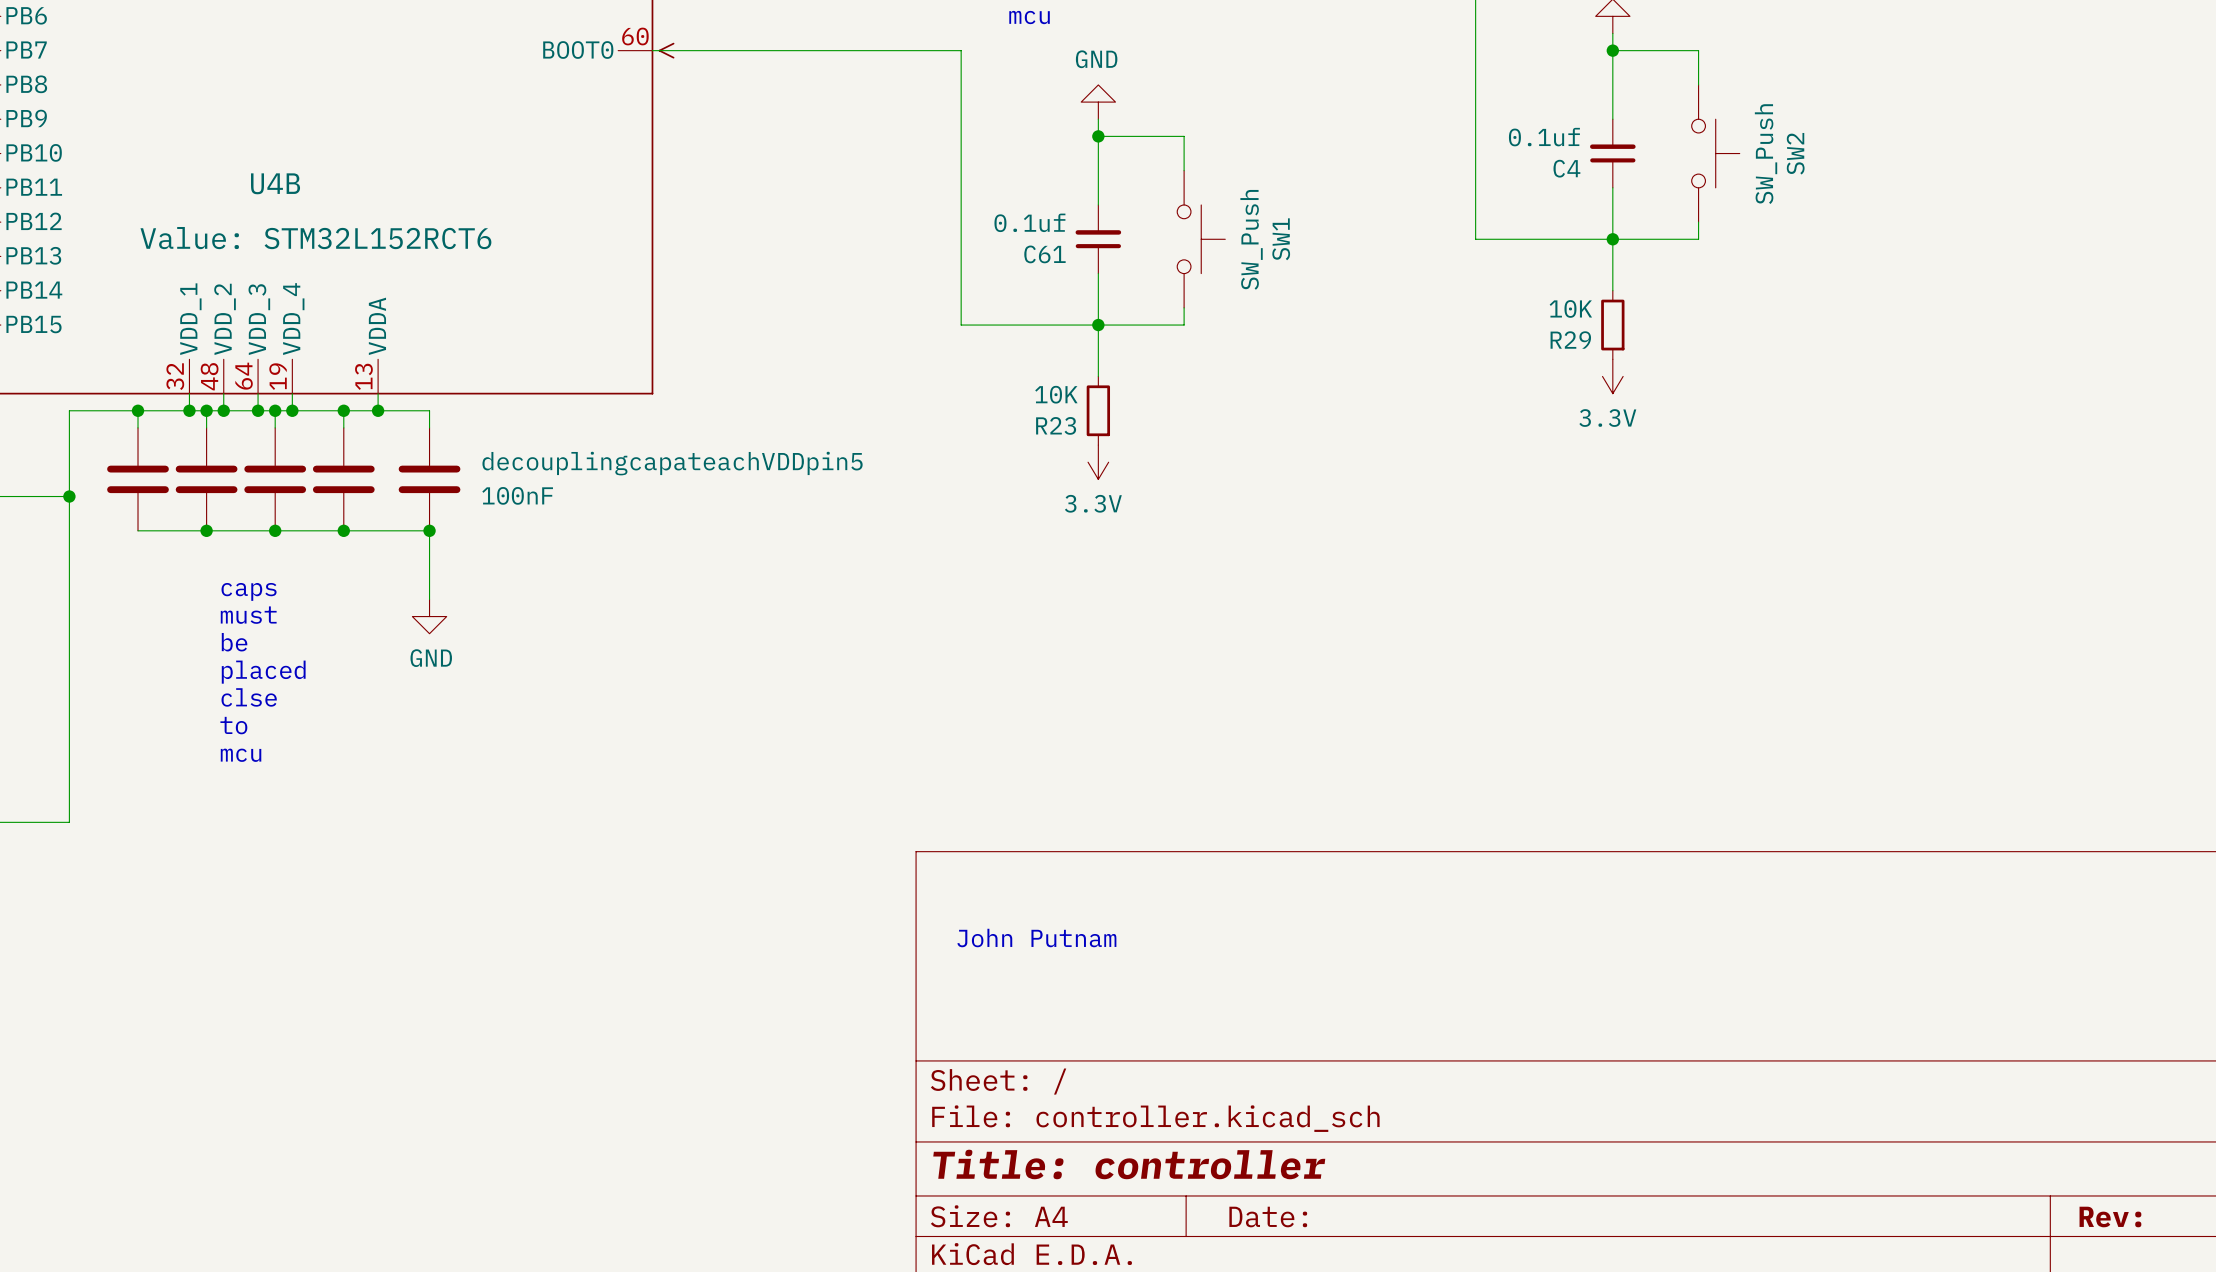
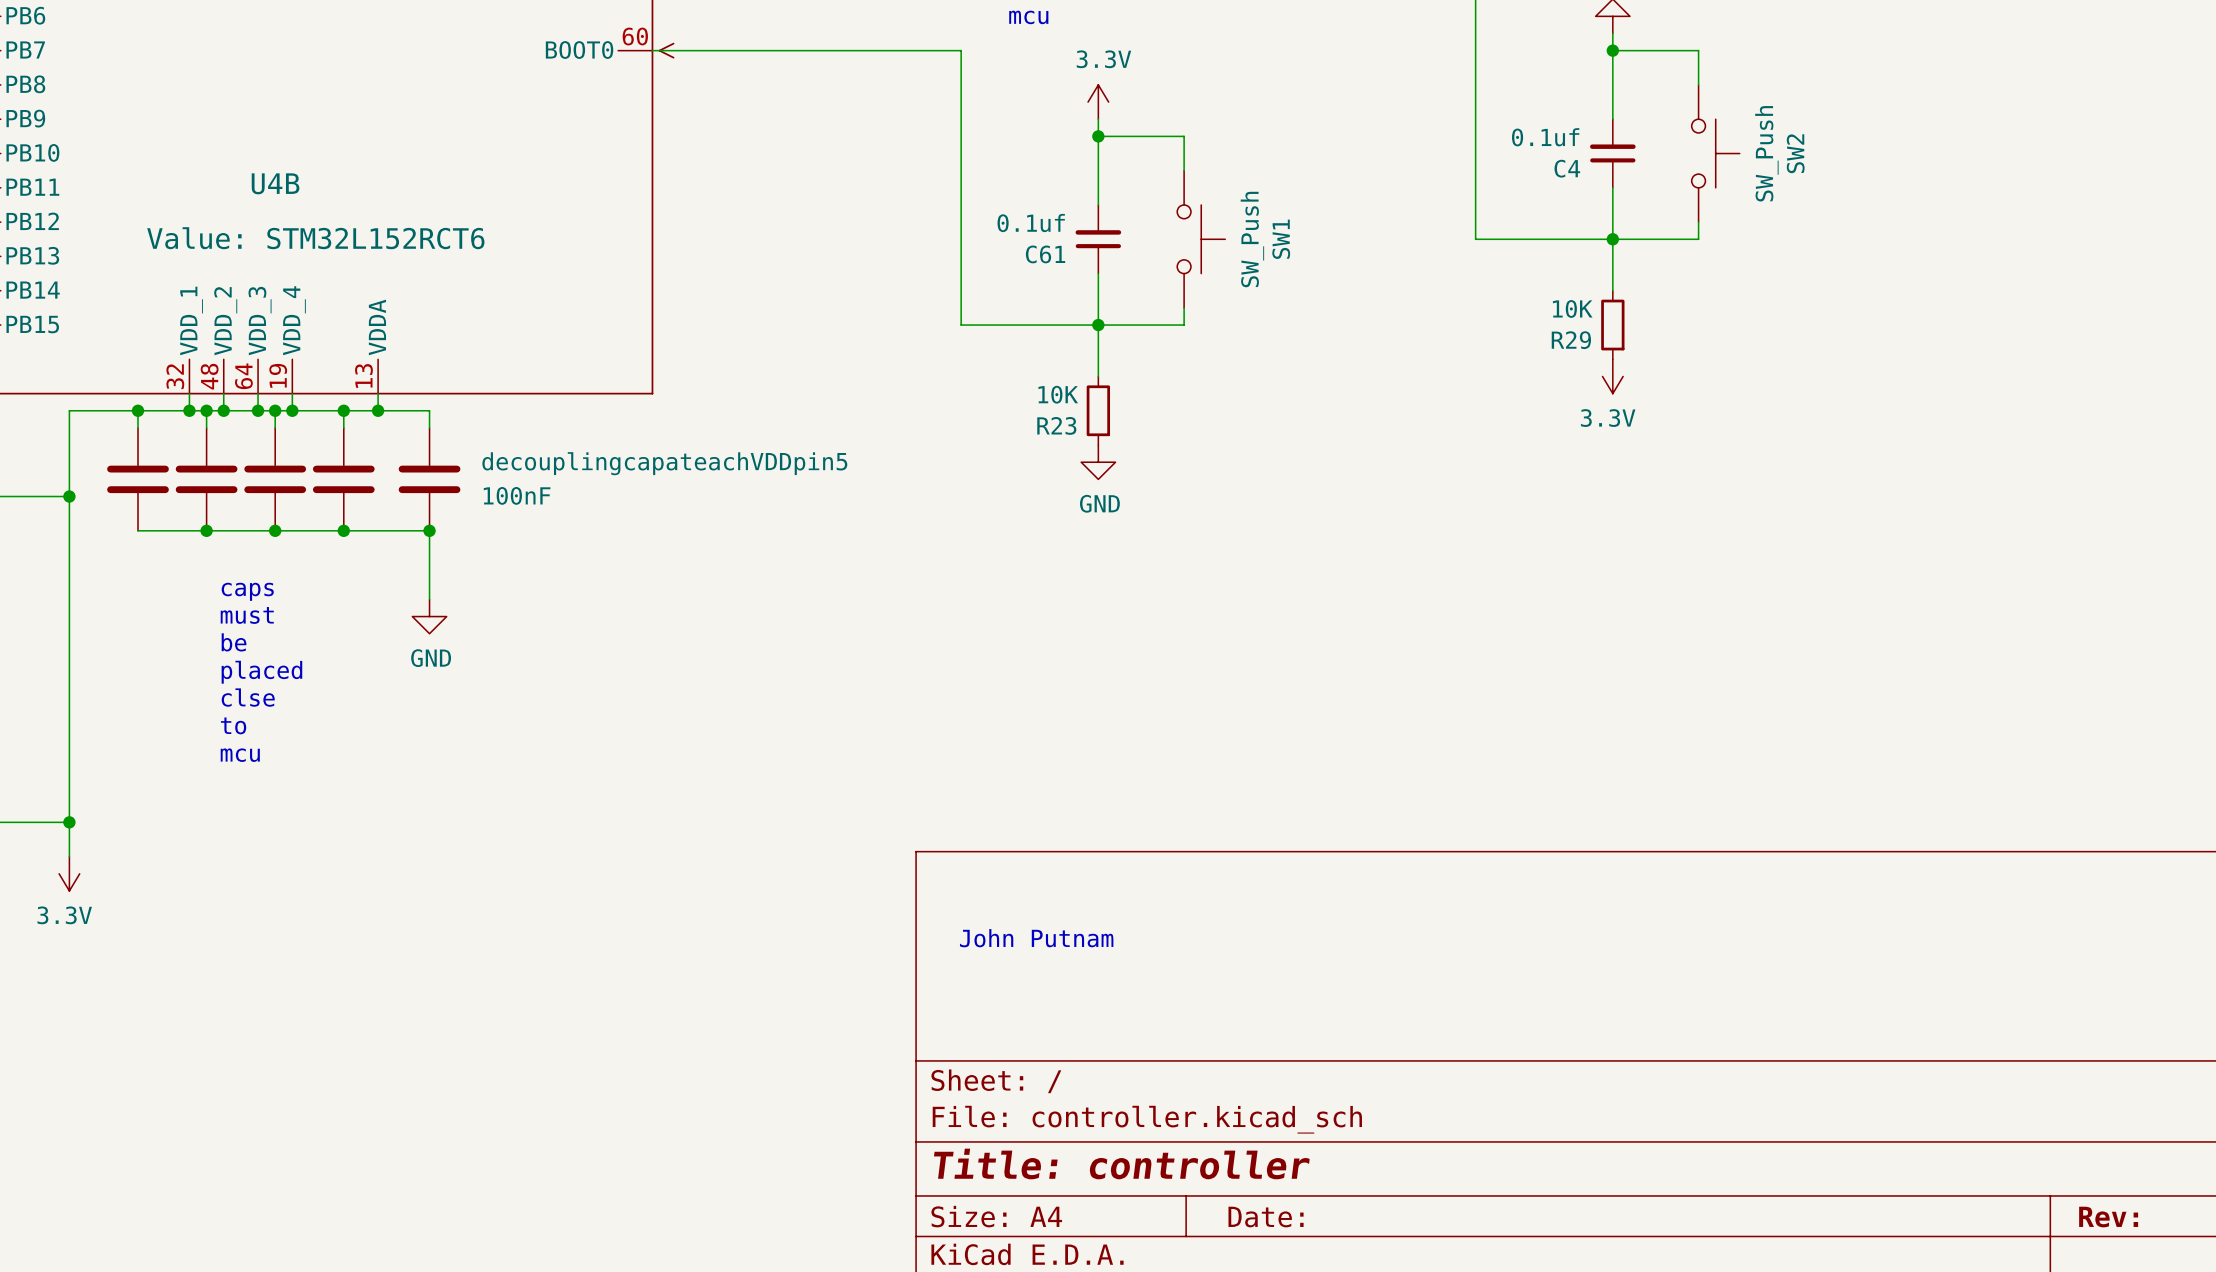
power symbol: GND (1098, 102) -> 3.3V (1098, 102)
power symbol: 3.3V (1098, 462) -> GND (1098, 462)
wire: none -> (69, 822) (69, 856)
junction: none -> (69, 822)
power symbol: none -> 3.3V (69, 873)

